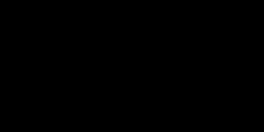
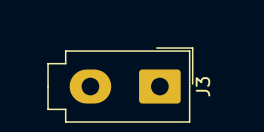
J3: none -> (120, 85)

